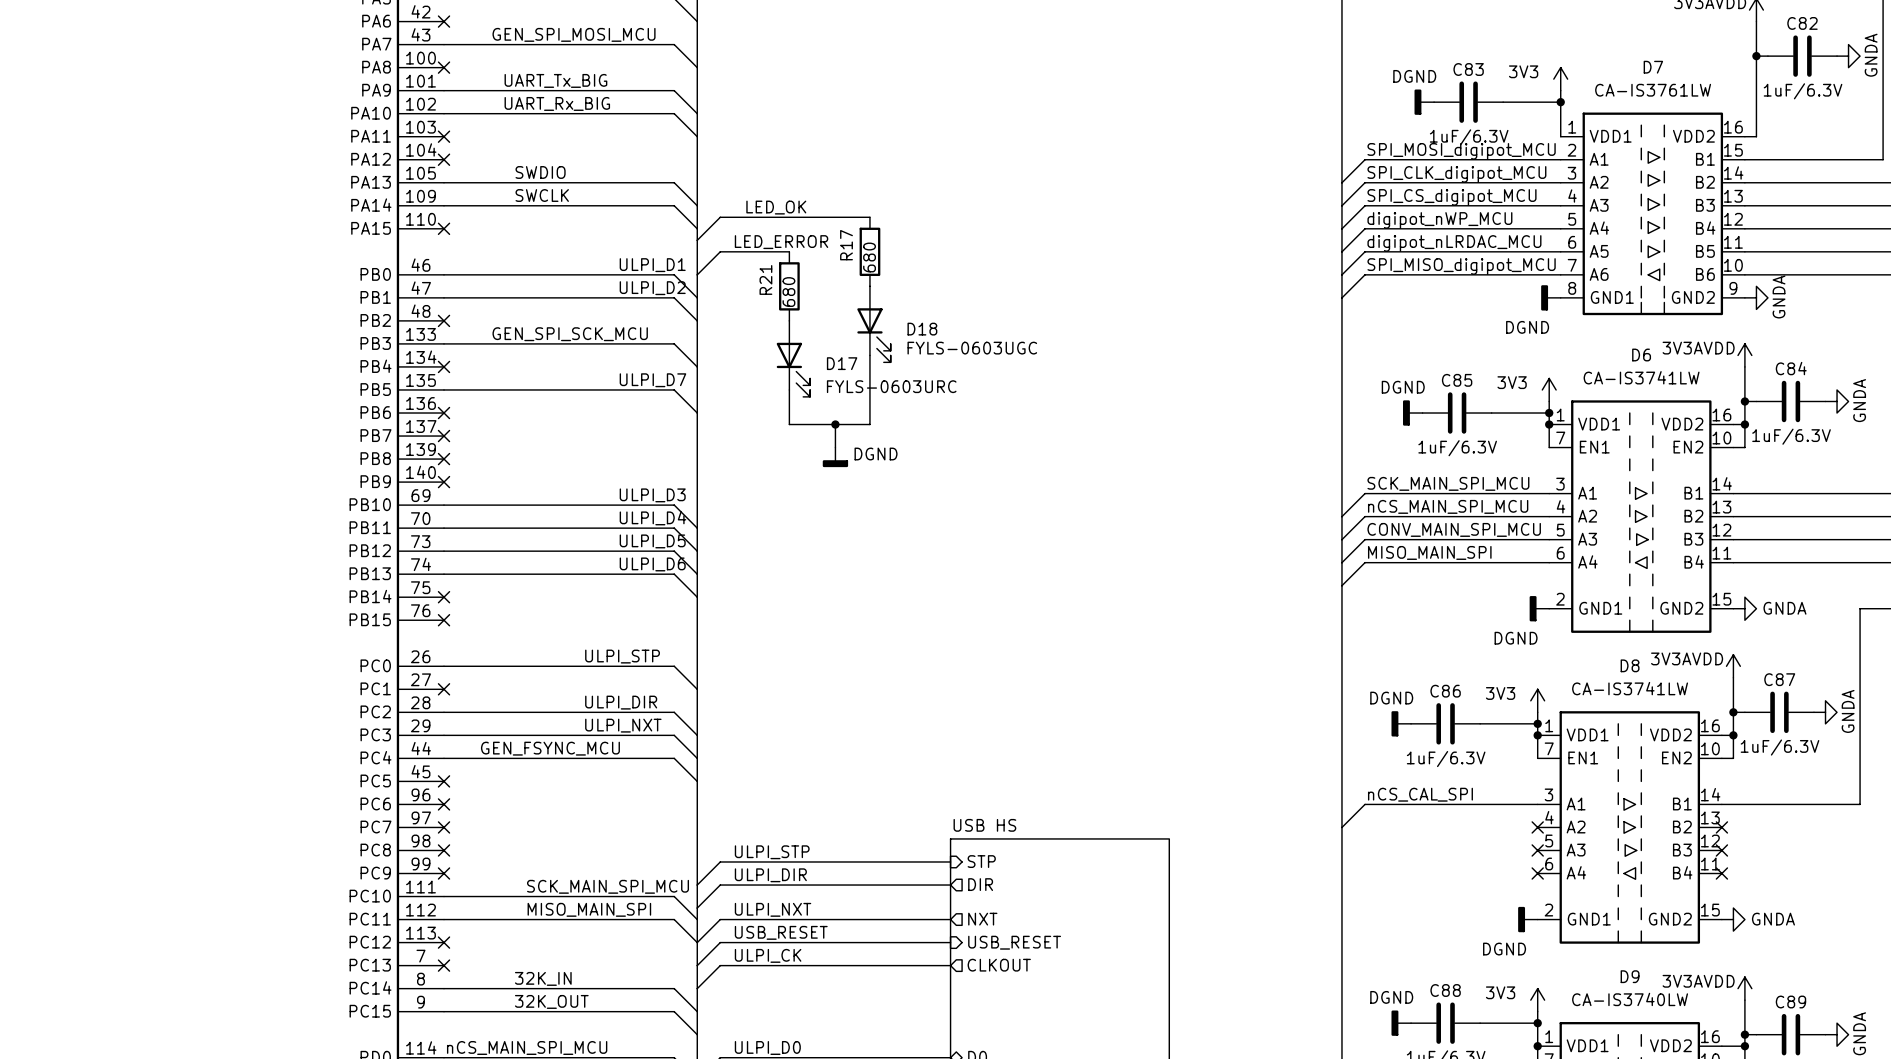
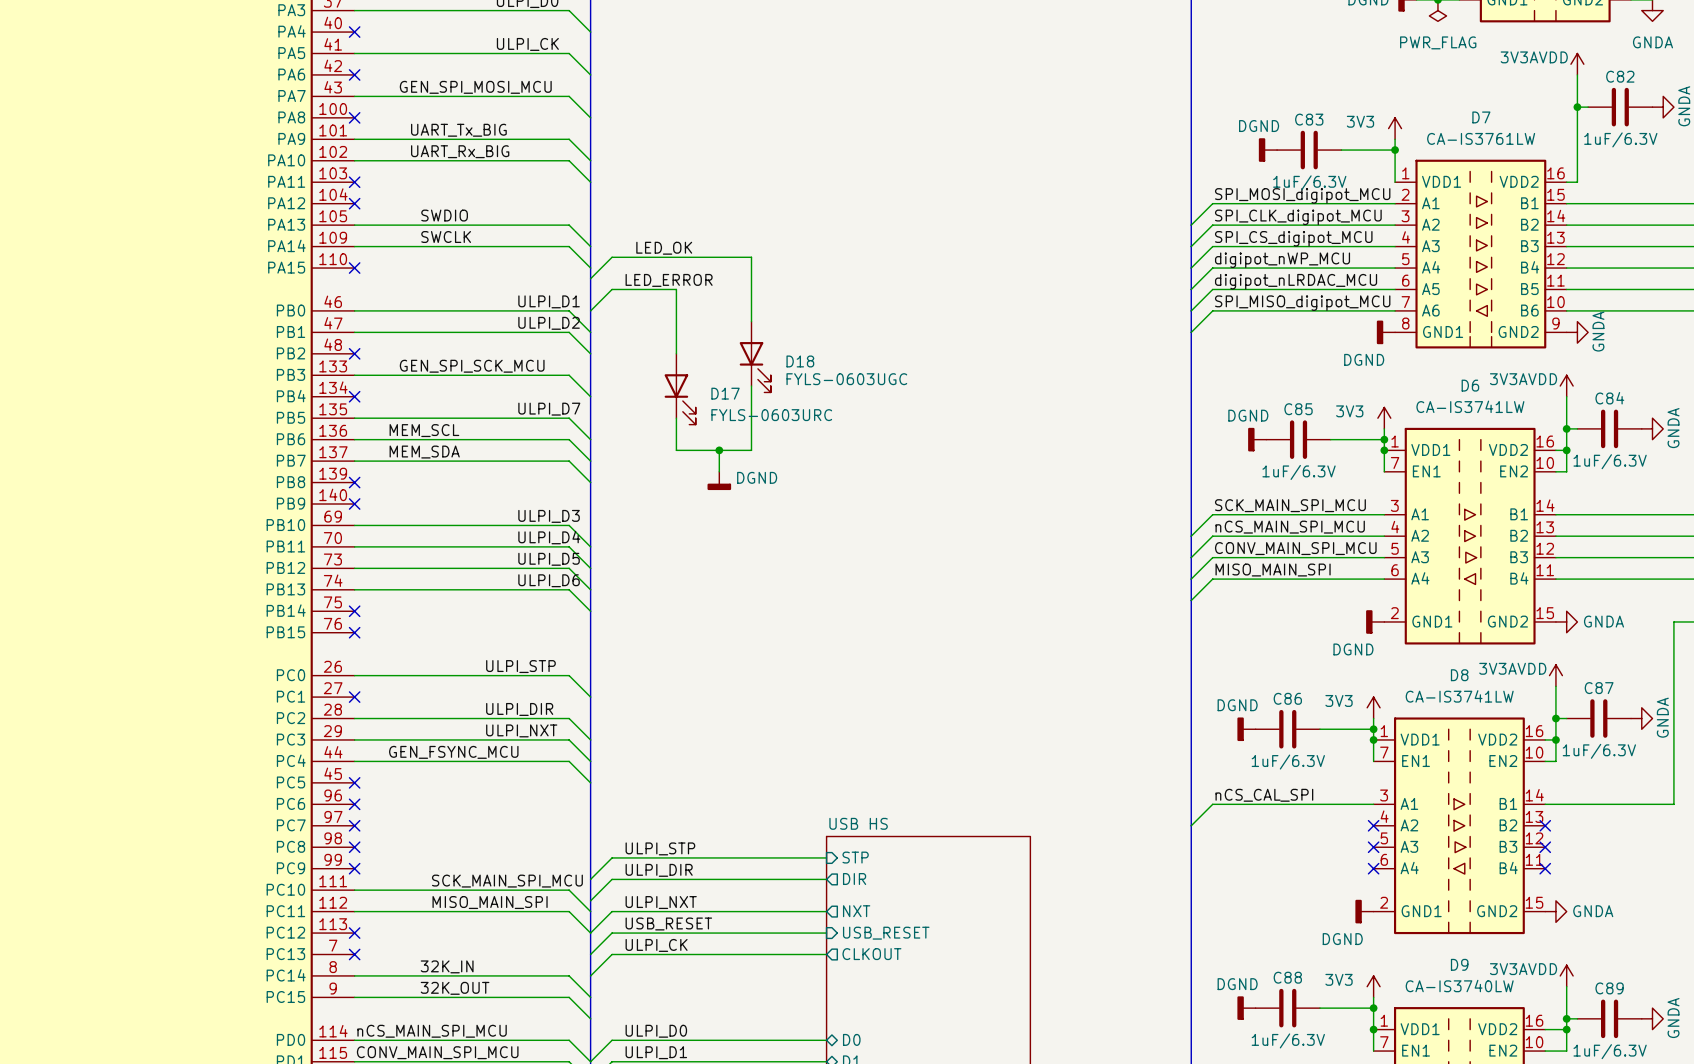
wire: none -> (751, 257) (751, 321)
wire: none -> (676, 289) (676, 353)
R17: 680 (869, 251) -> none
R21: 680 (789, 286) -> none
label: none -> MEM_SCL (424, 430)
wire: none -> (354, 439) (569, 439) (590, 461)
no-connect mark: (444, 413) -> none
label: none -> MEM_SDA (424, 452)
wire: none -> (354, 461) (569, 461) (590, 482)
no-connect mark: (444, 436) -> none

